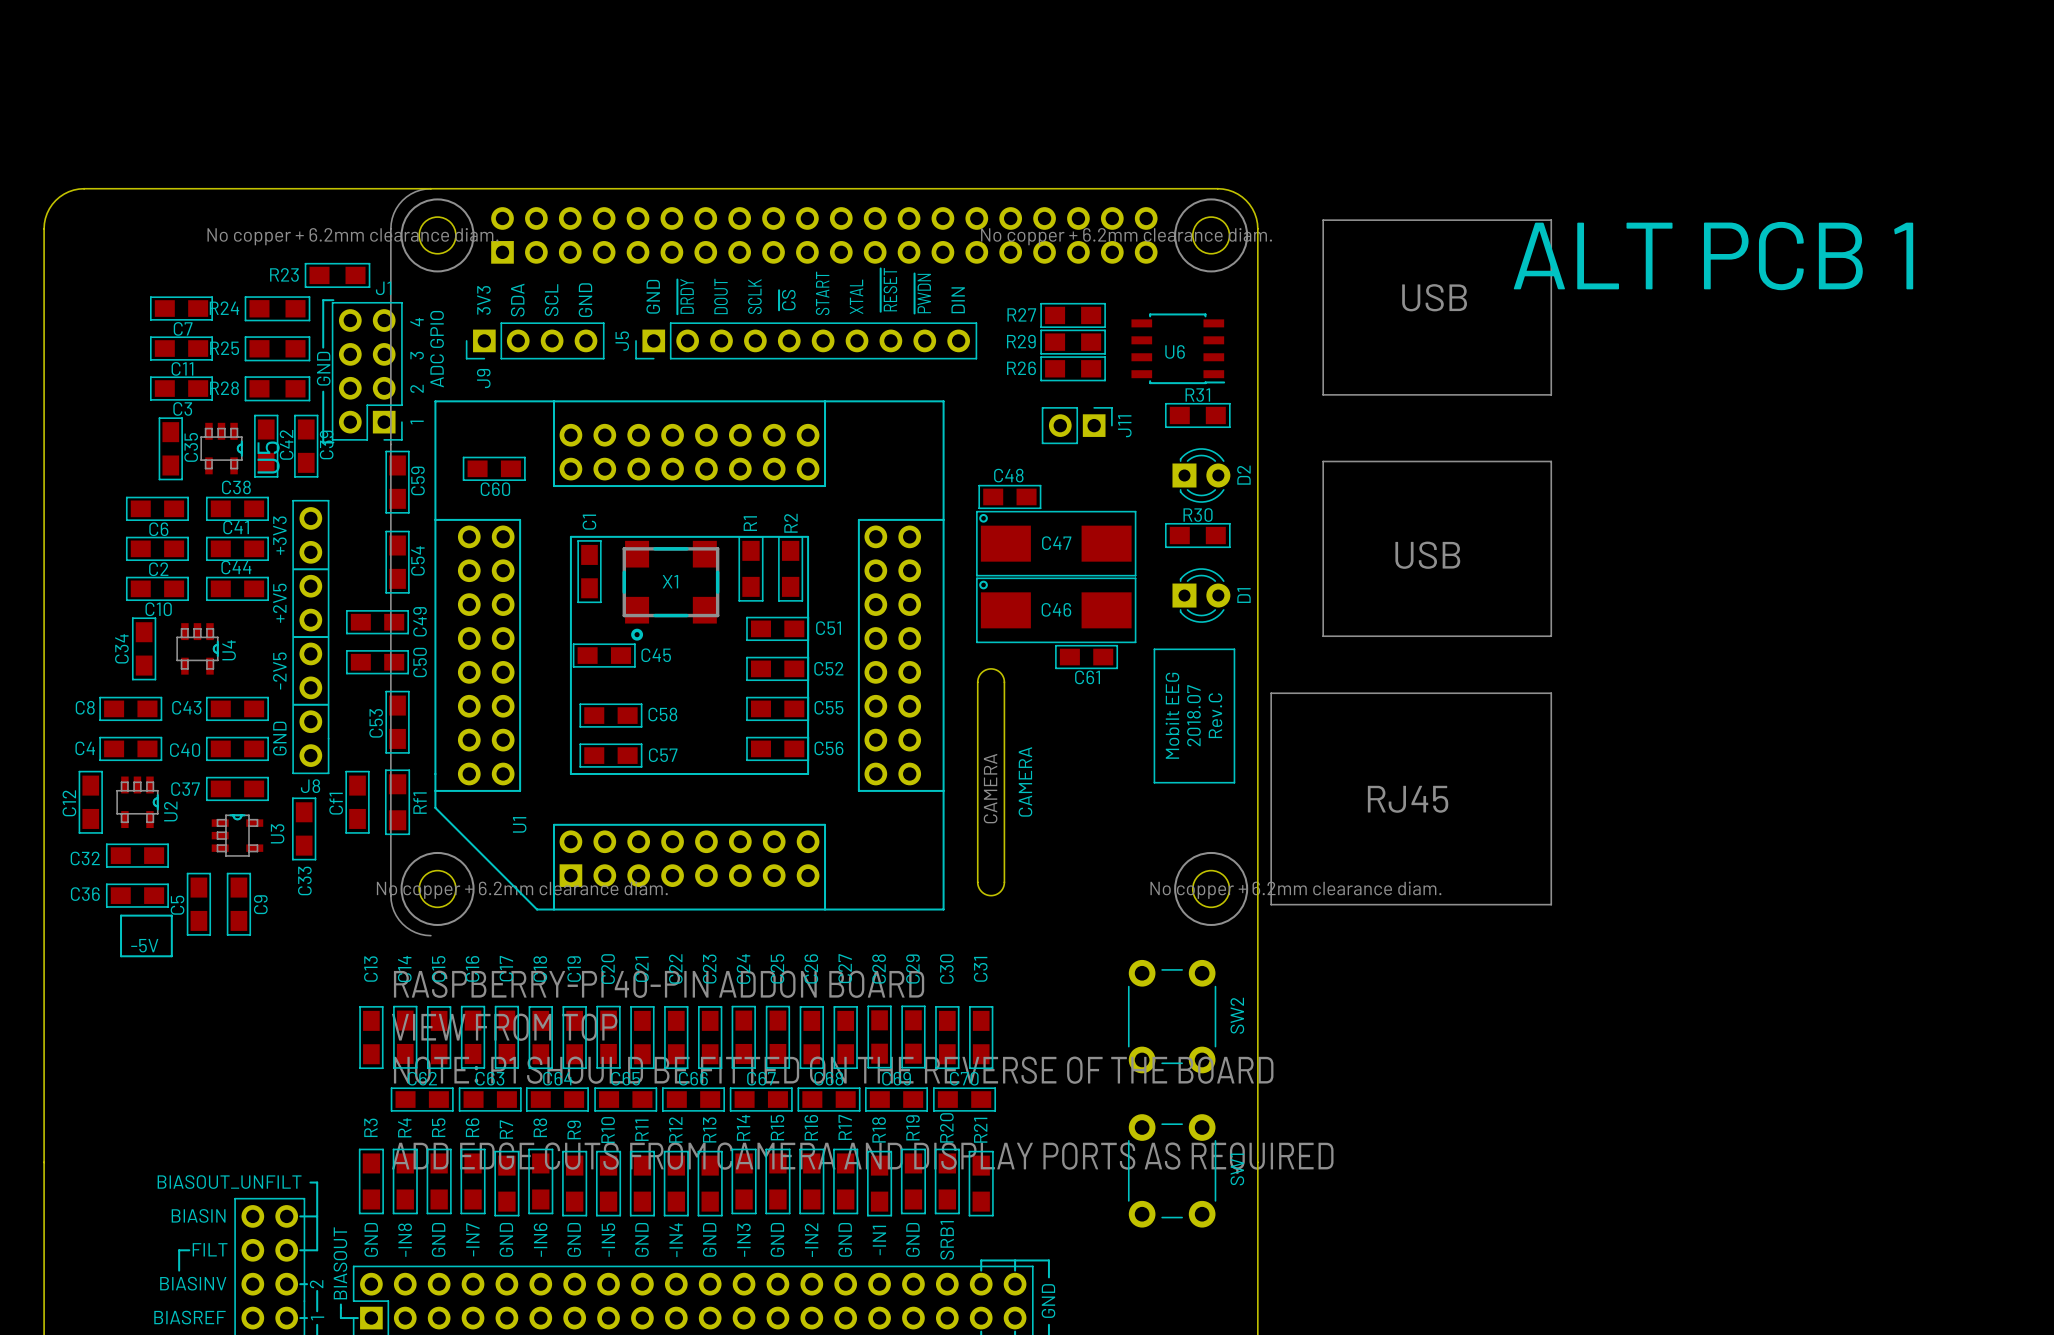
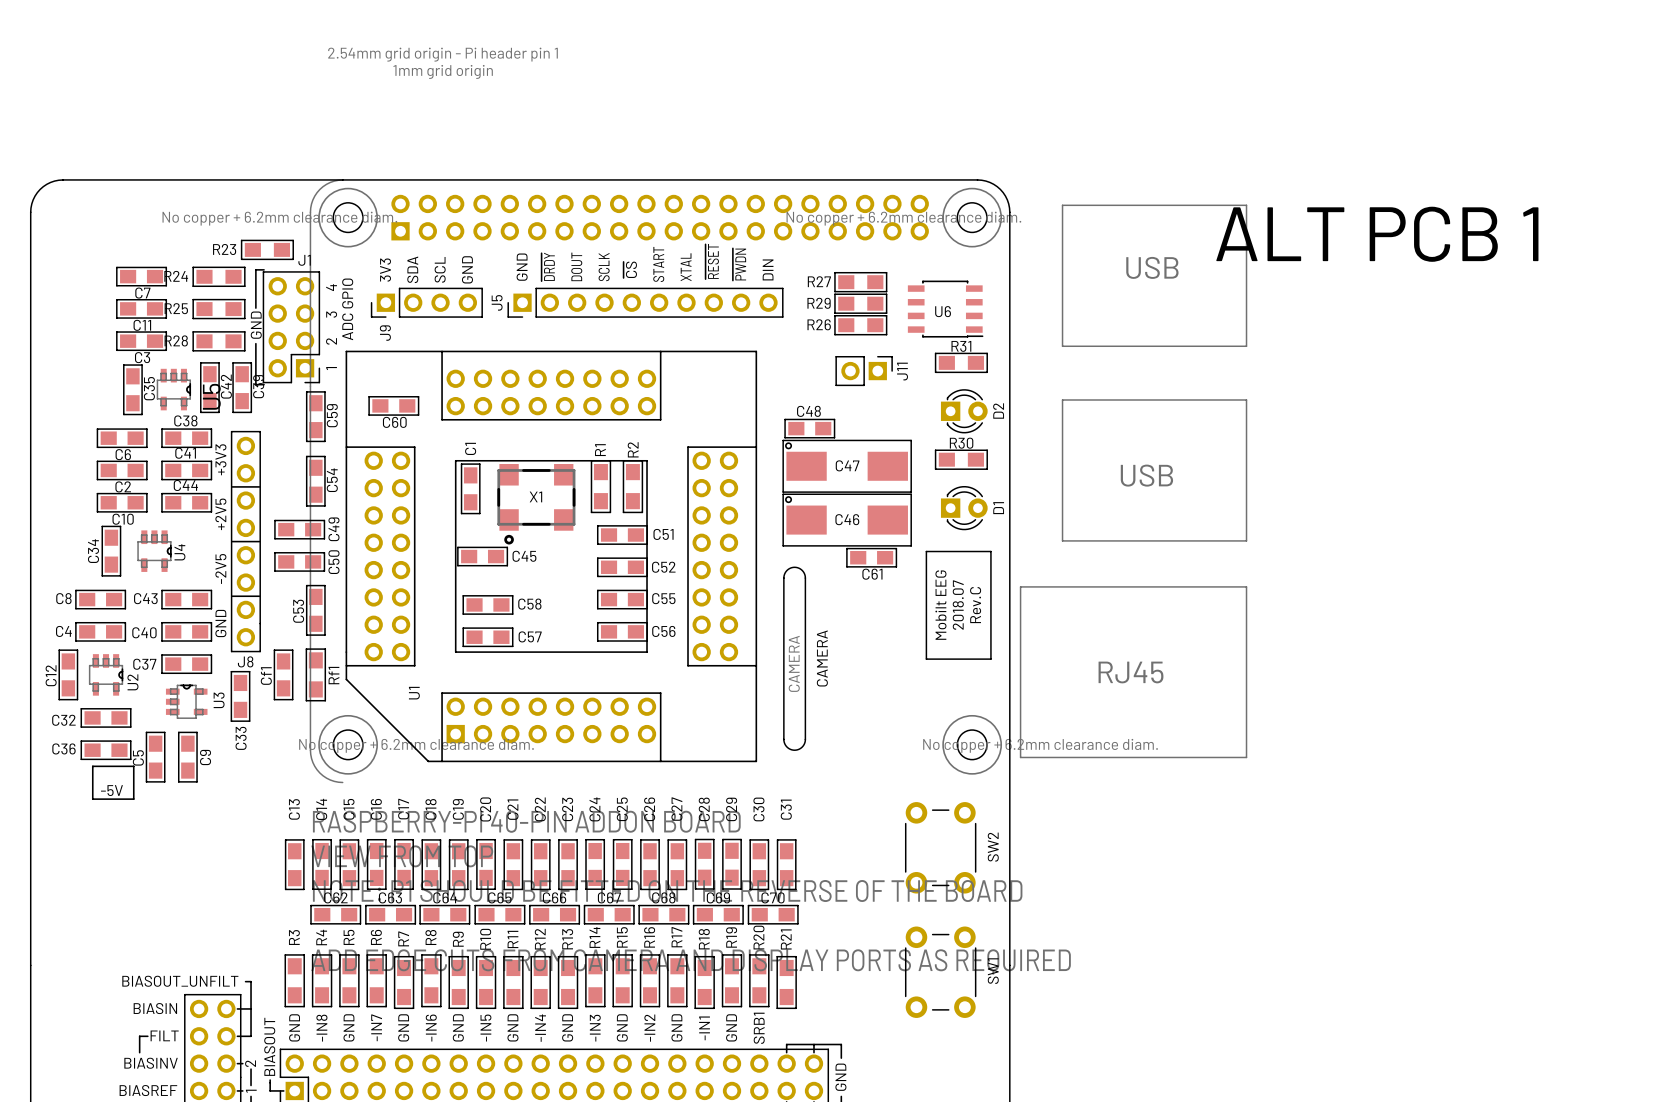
text: none -> 2.54mm grid origin - Pi header pin 1 (442, 54)
text: none -> 1mm grid origin (443, 71)

